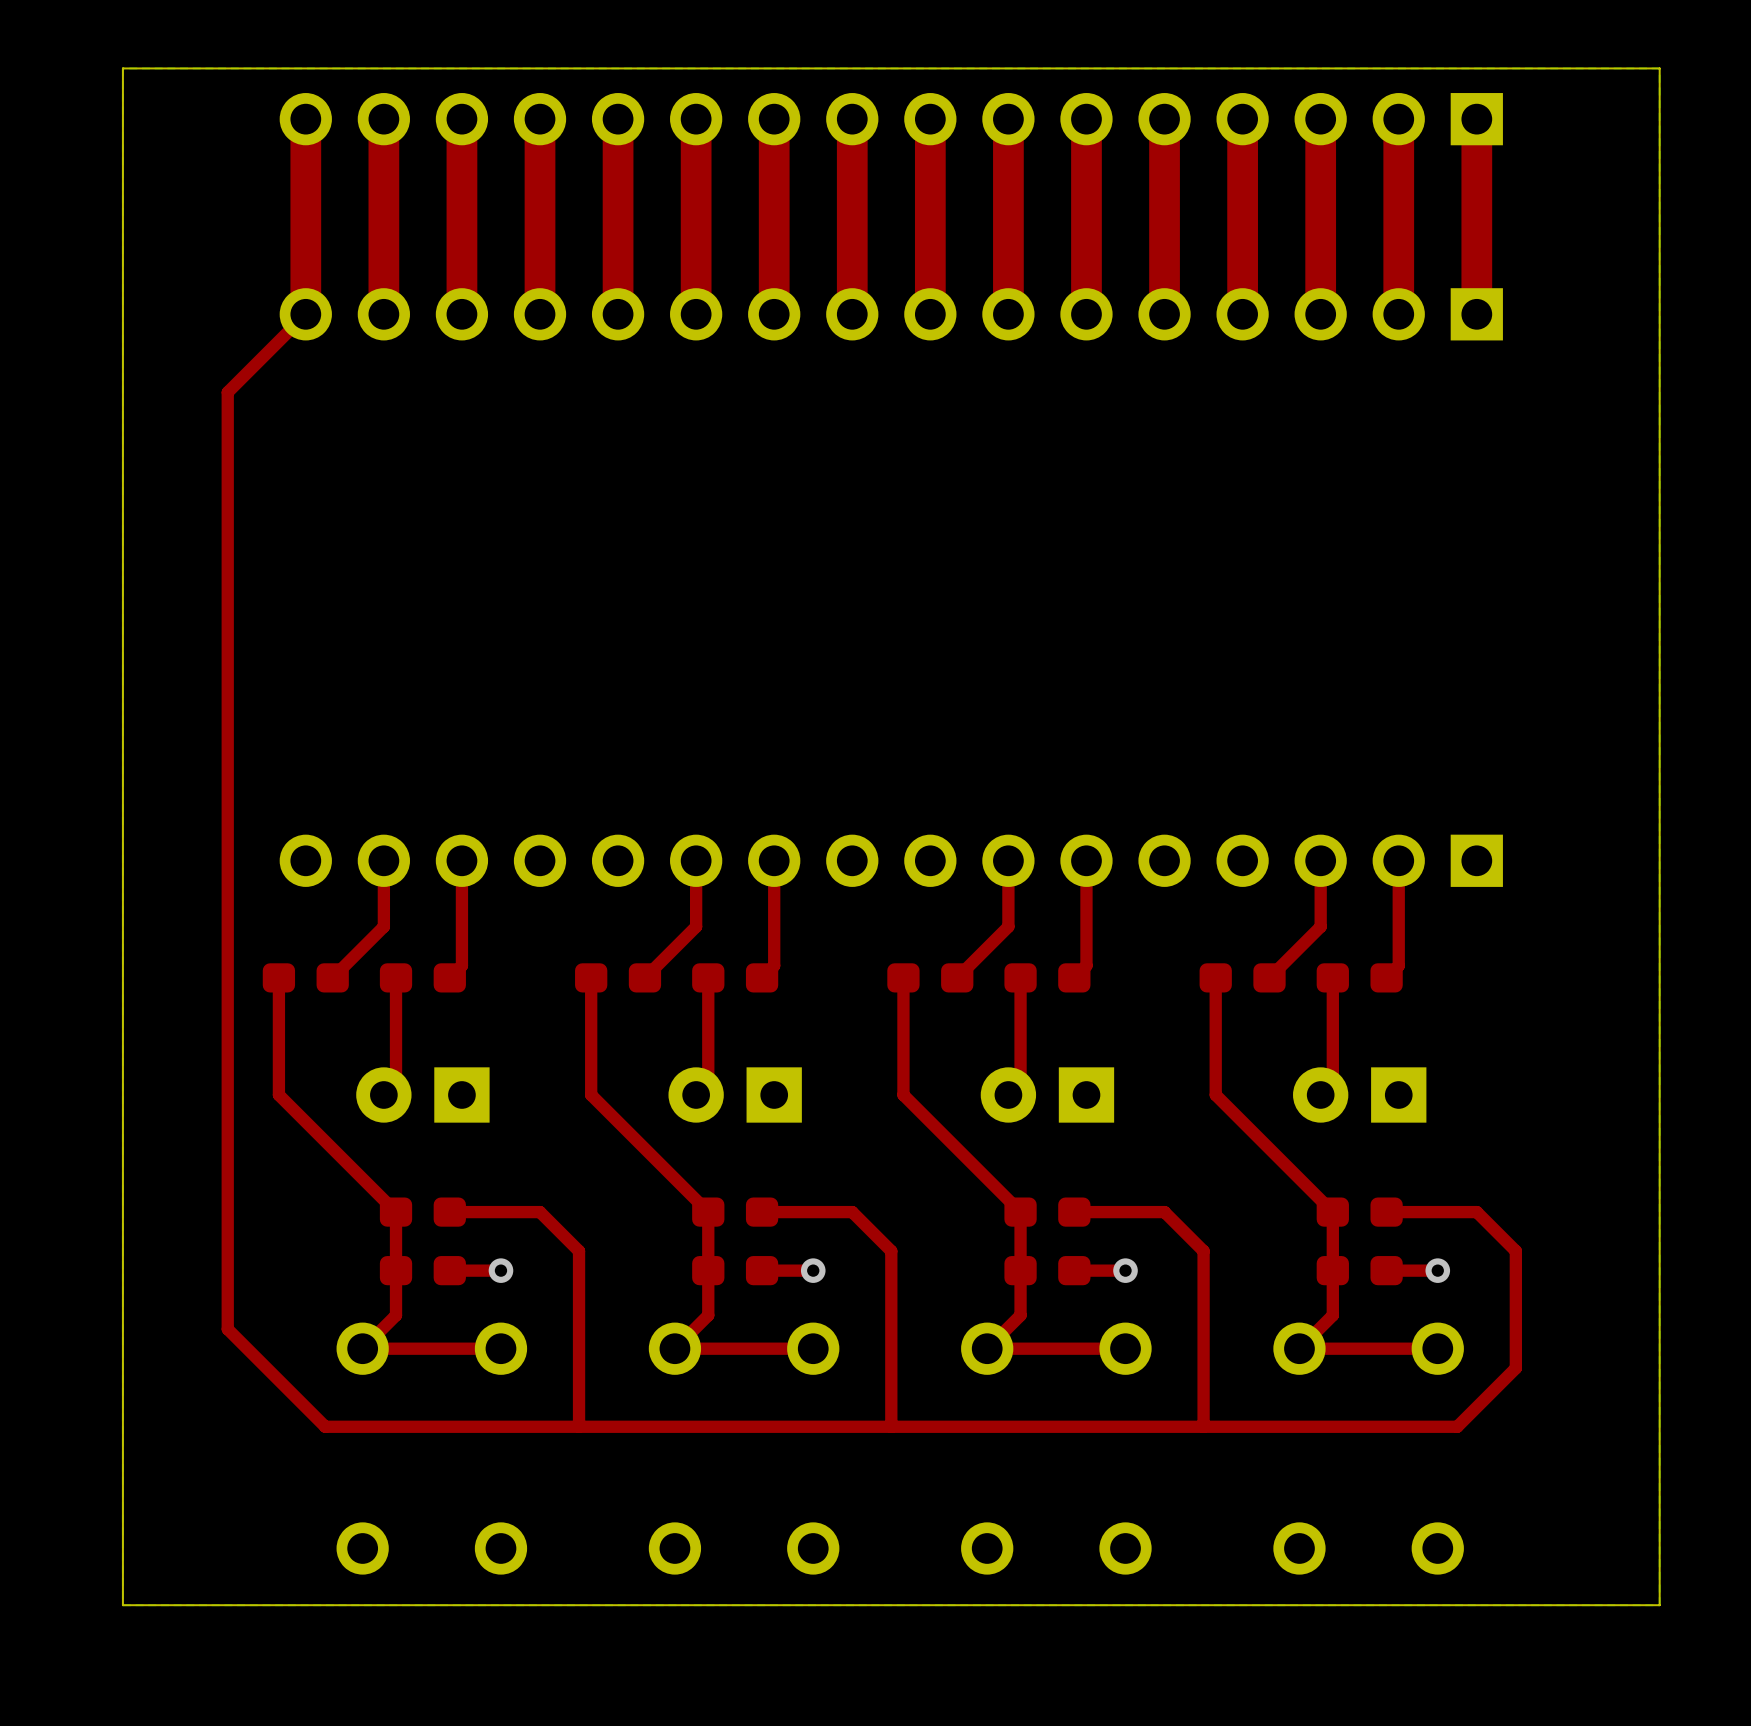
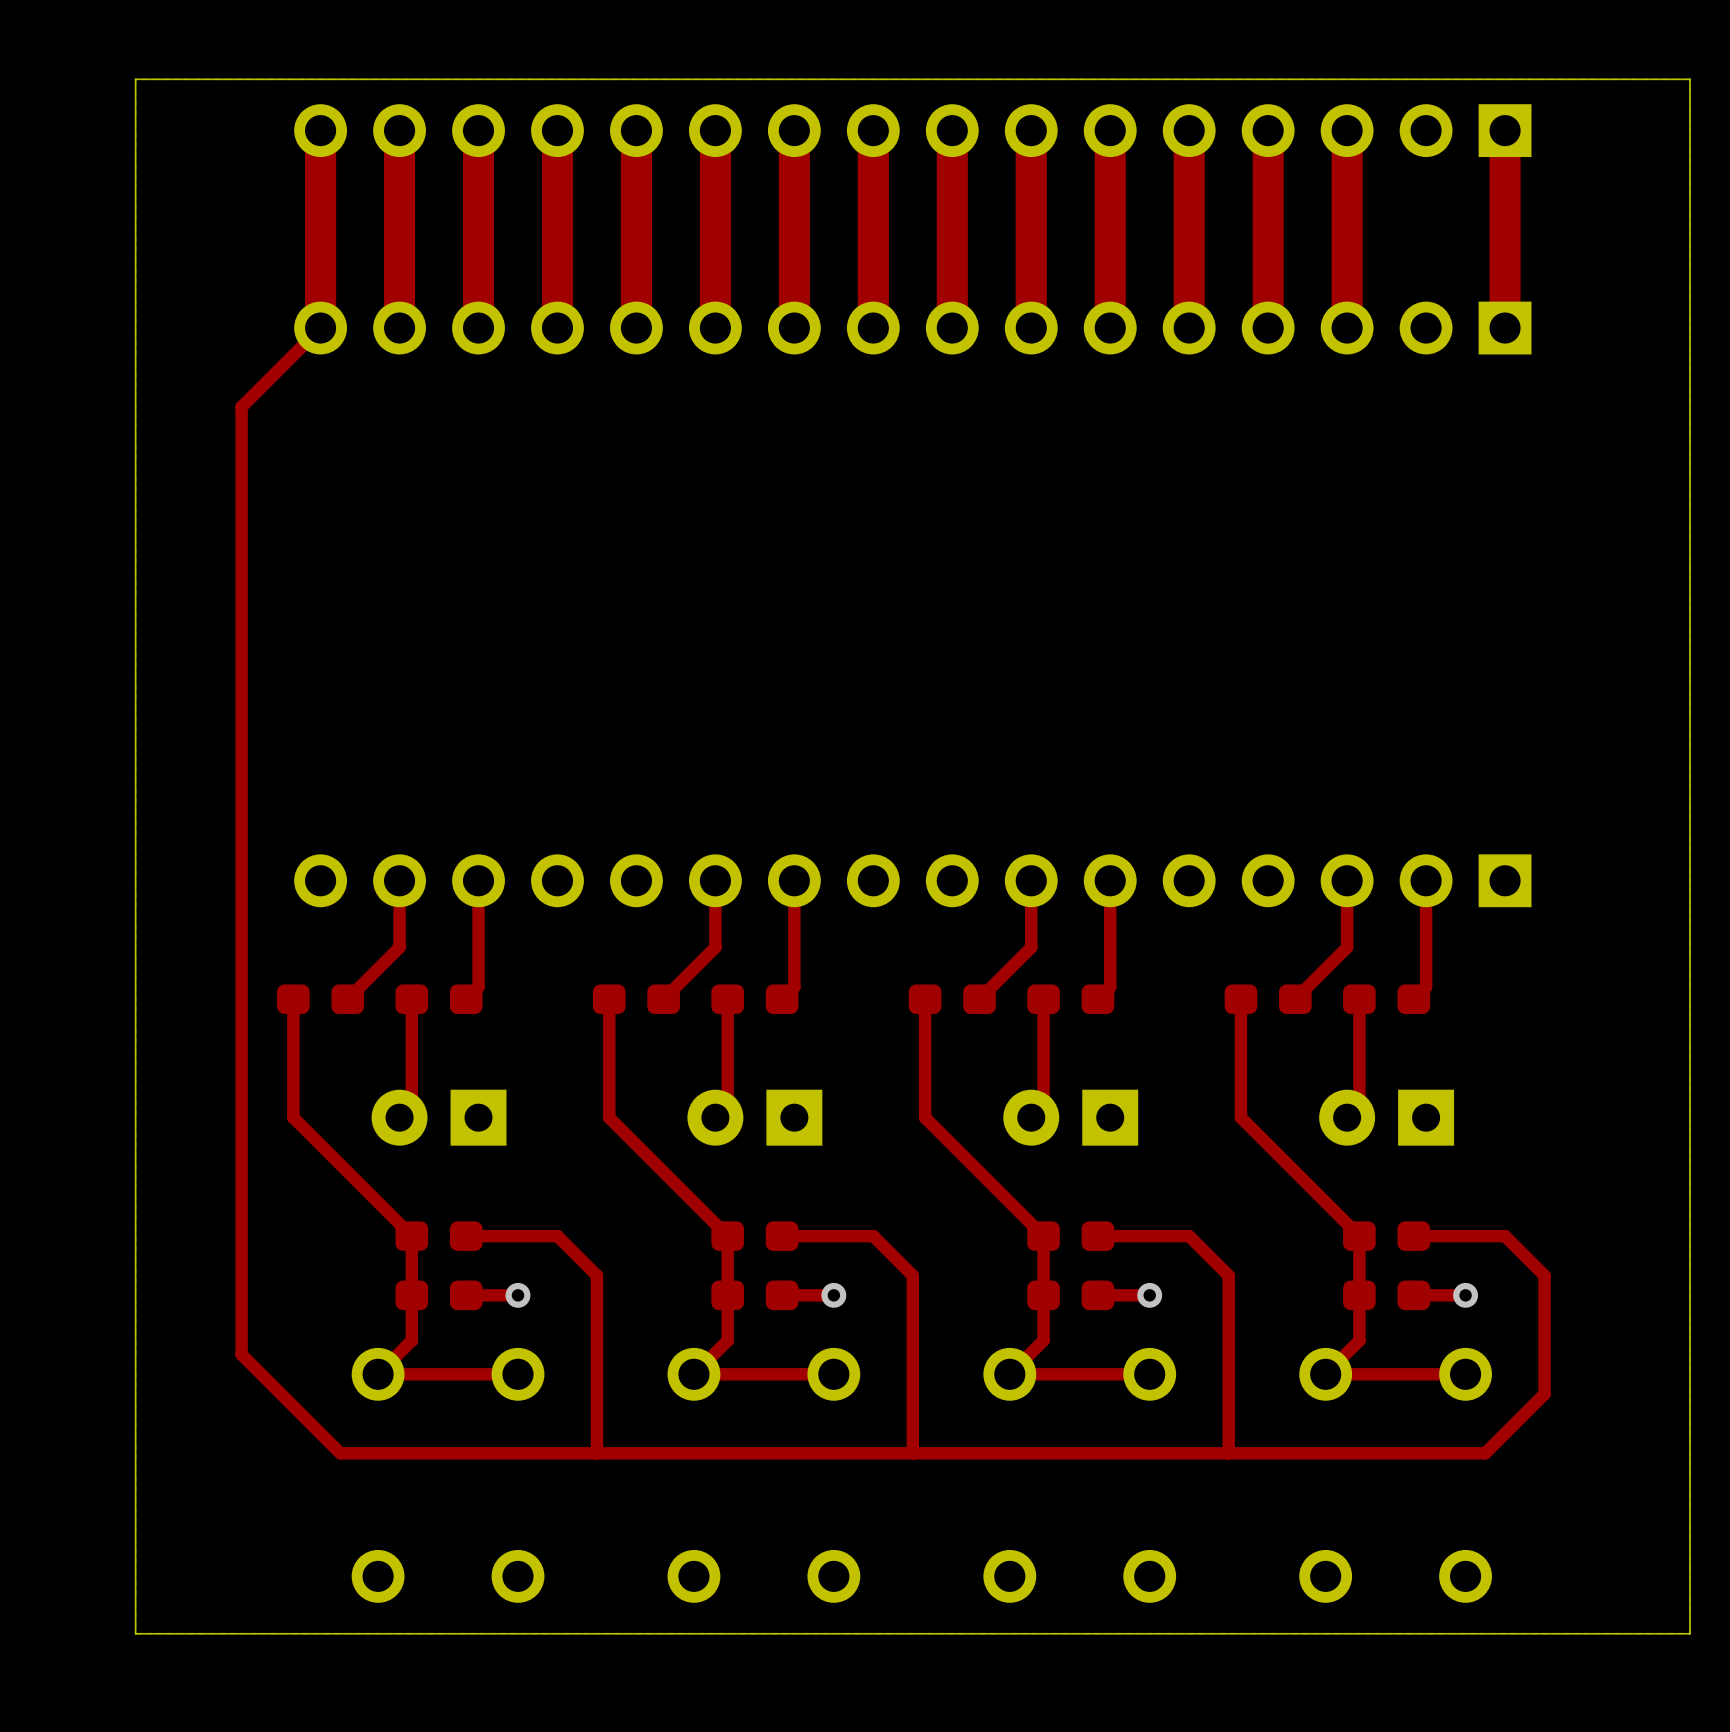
top track: (1398, 119) (1398, 314) -> none

